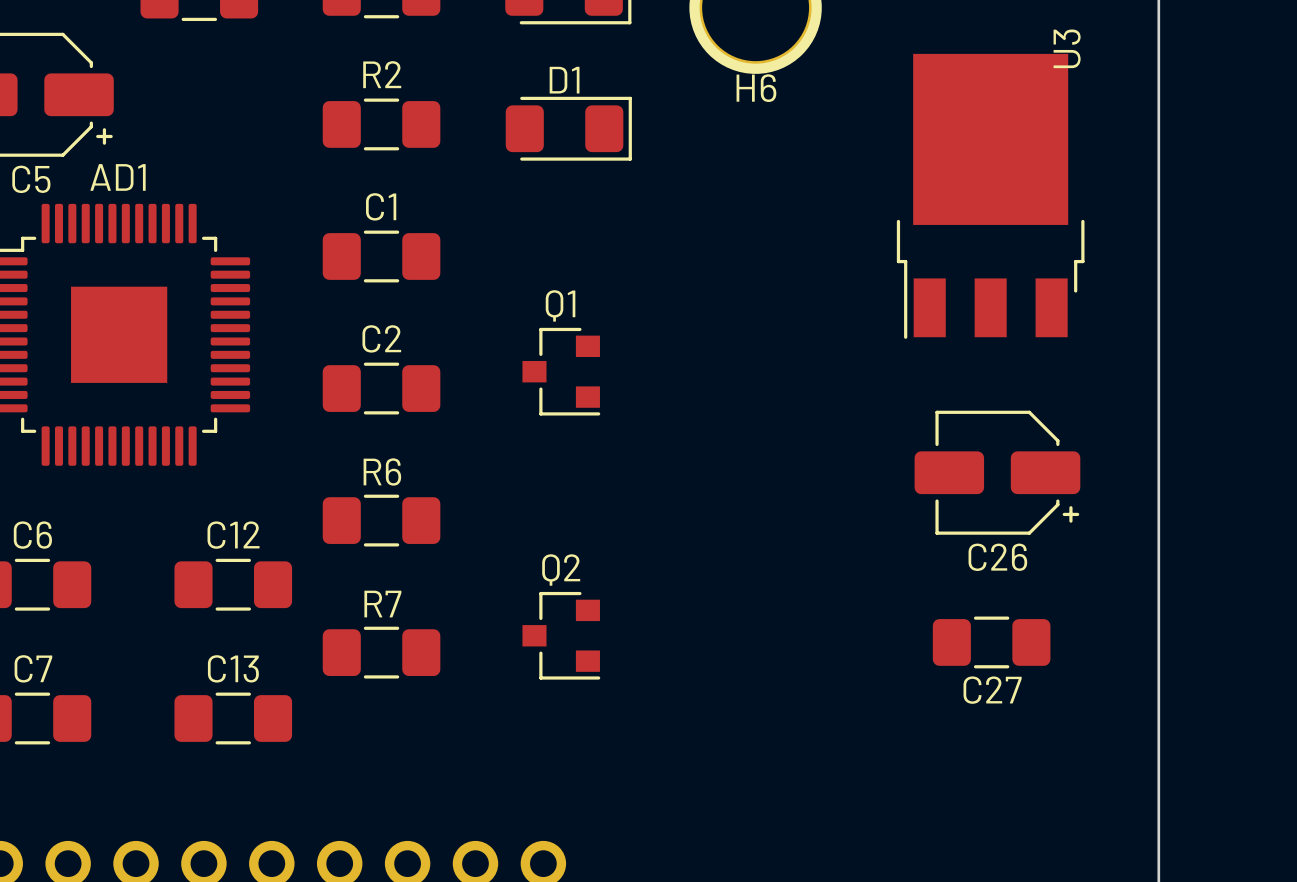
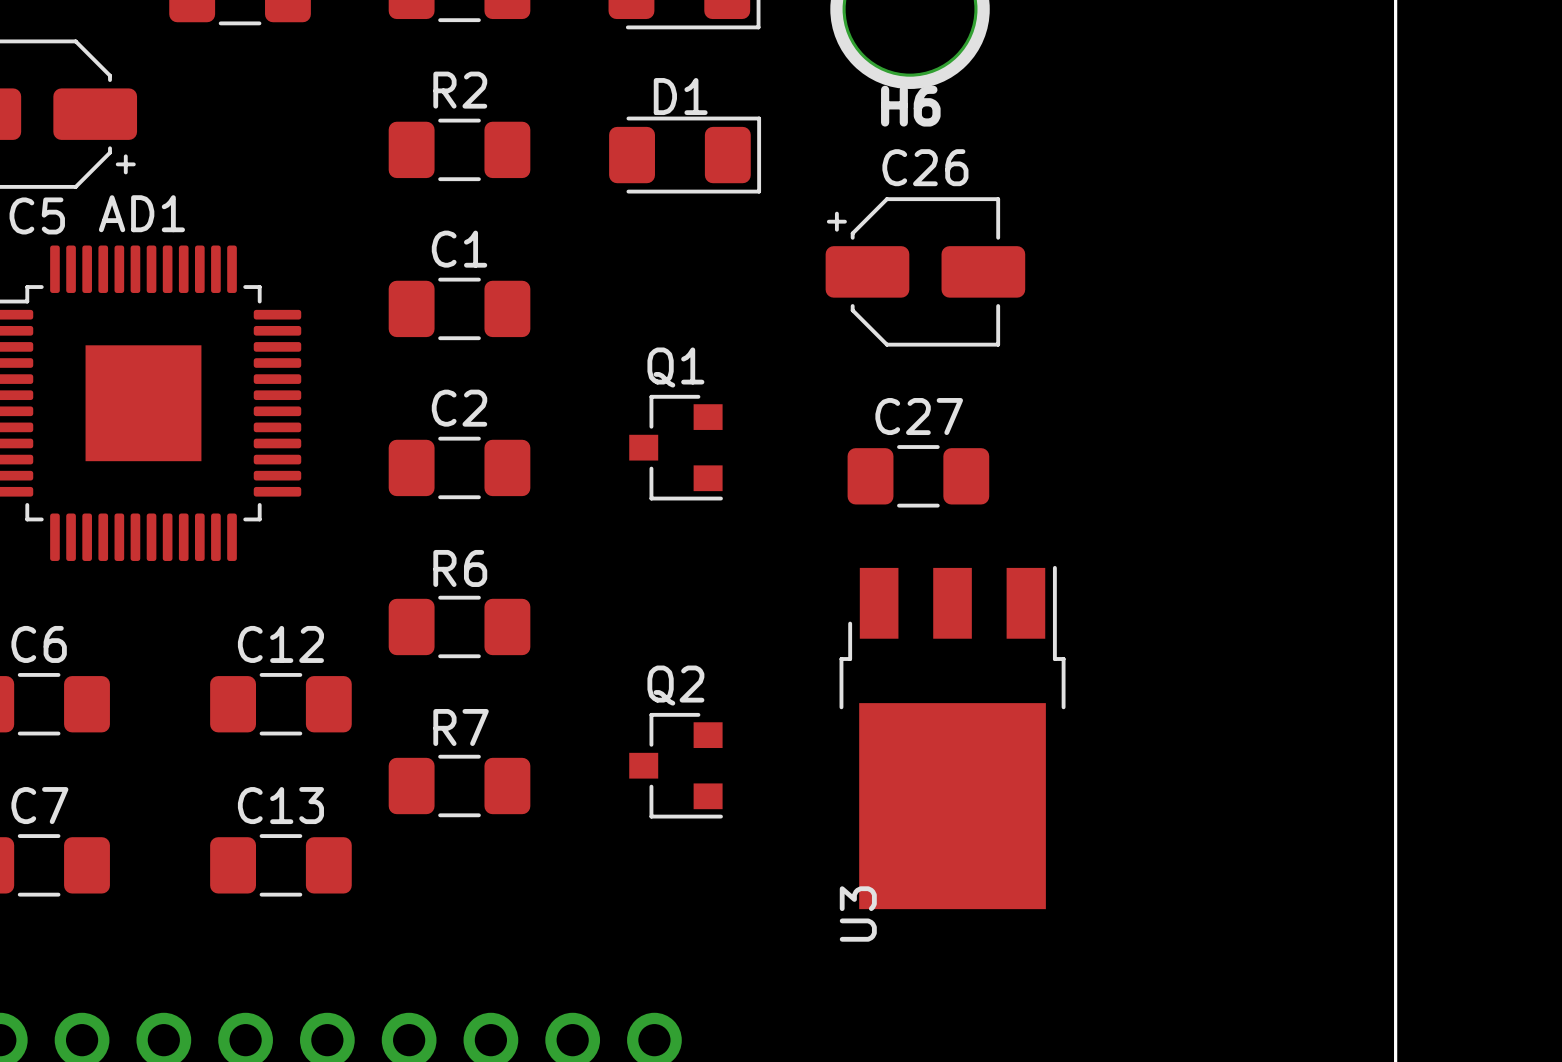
U3 rotation: 0° (990, 196) -> 180° (952, 737)
U3 position: (990, 196) -> (952, 737)
C26 rotation: 0° (997, 472) -> 180° (925, 271)
C26 position: (997, 472) -> (925, 271)
C27 position: (991, 642) -> (918, 476)
C27 name position: C27 (992, 690) -> C27 (919, 416)

